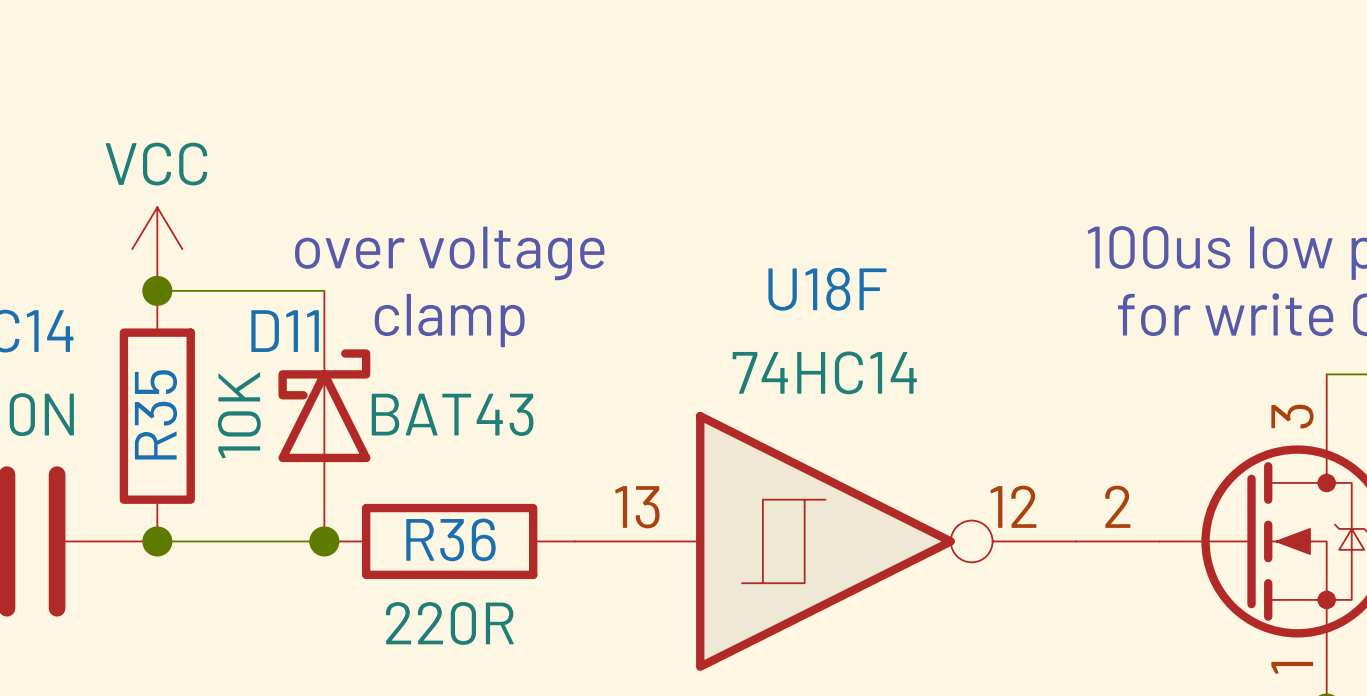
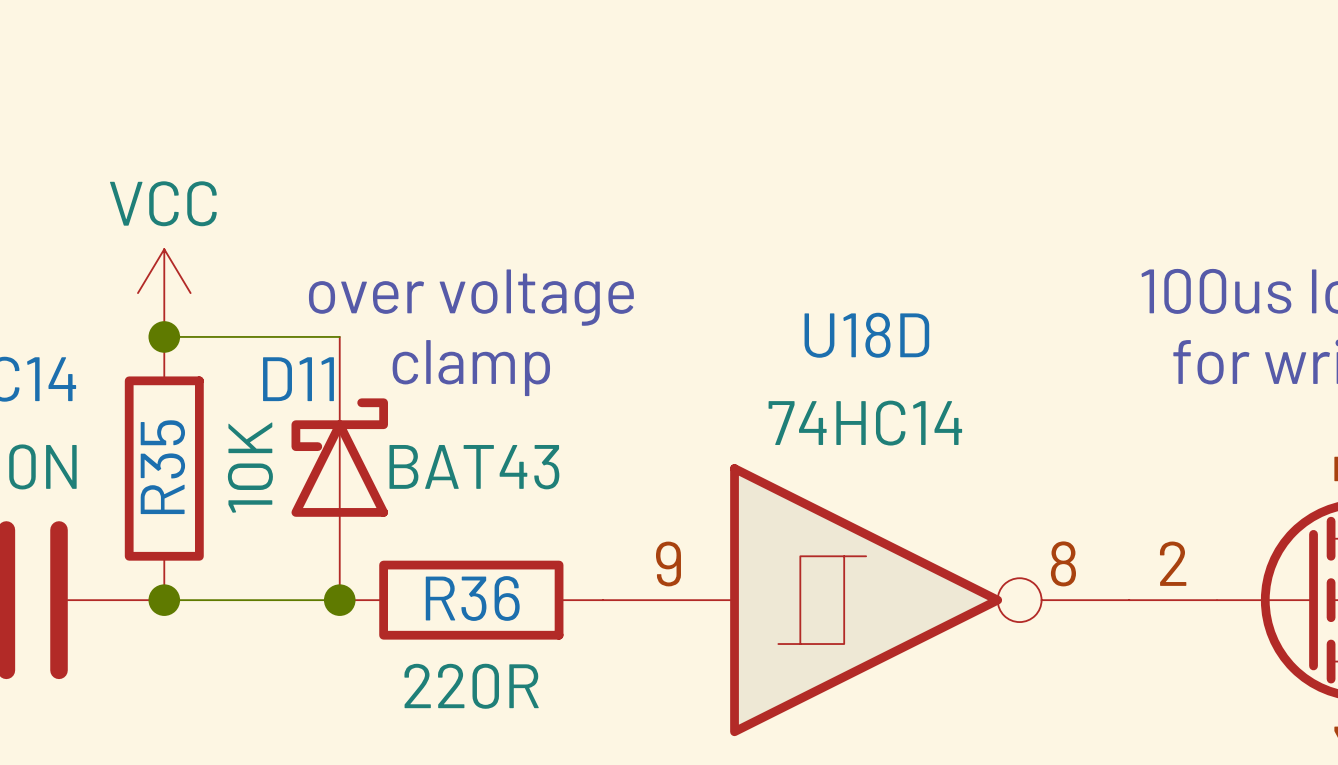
U18F name: U18F (827, 289) -> U18D (866, 335)
U18F pin number: 12 (1013, 506) -> 8 (1063, 563)
U18F pin number: 13 (637, 507) -> 9 (668, 563)

